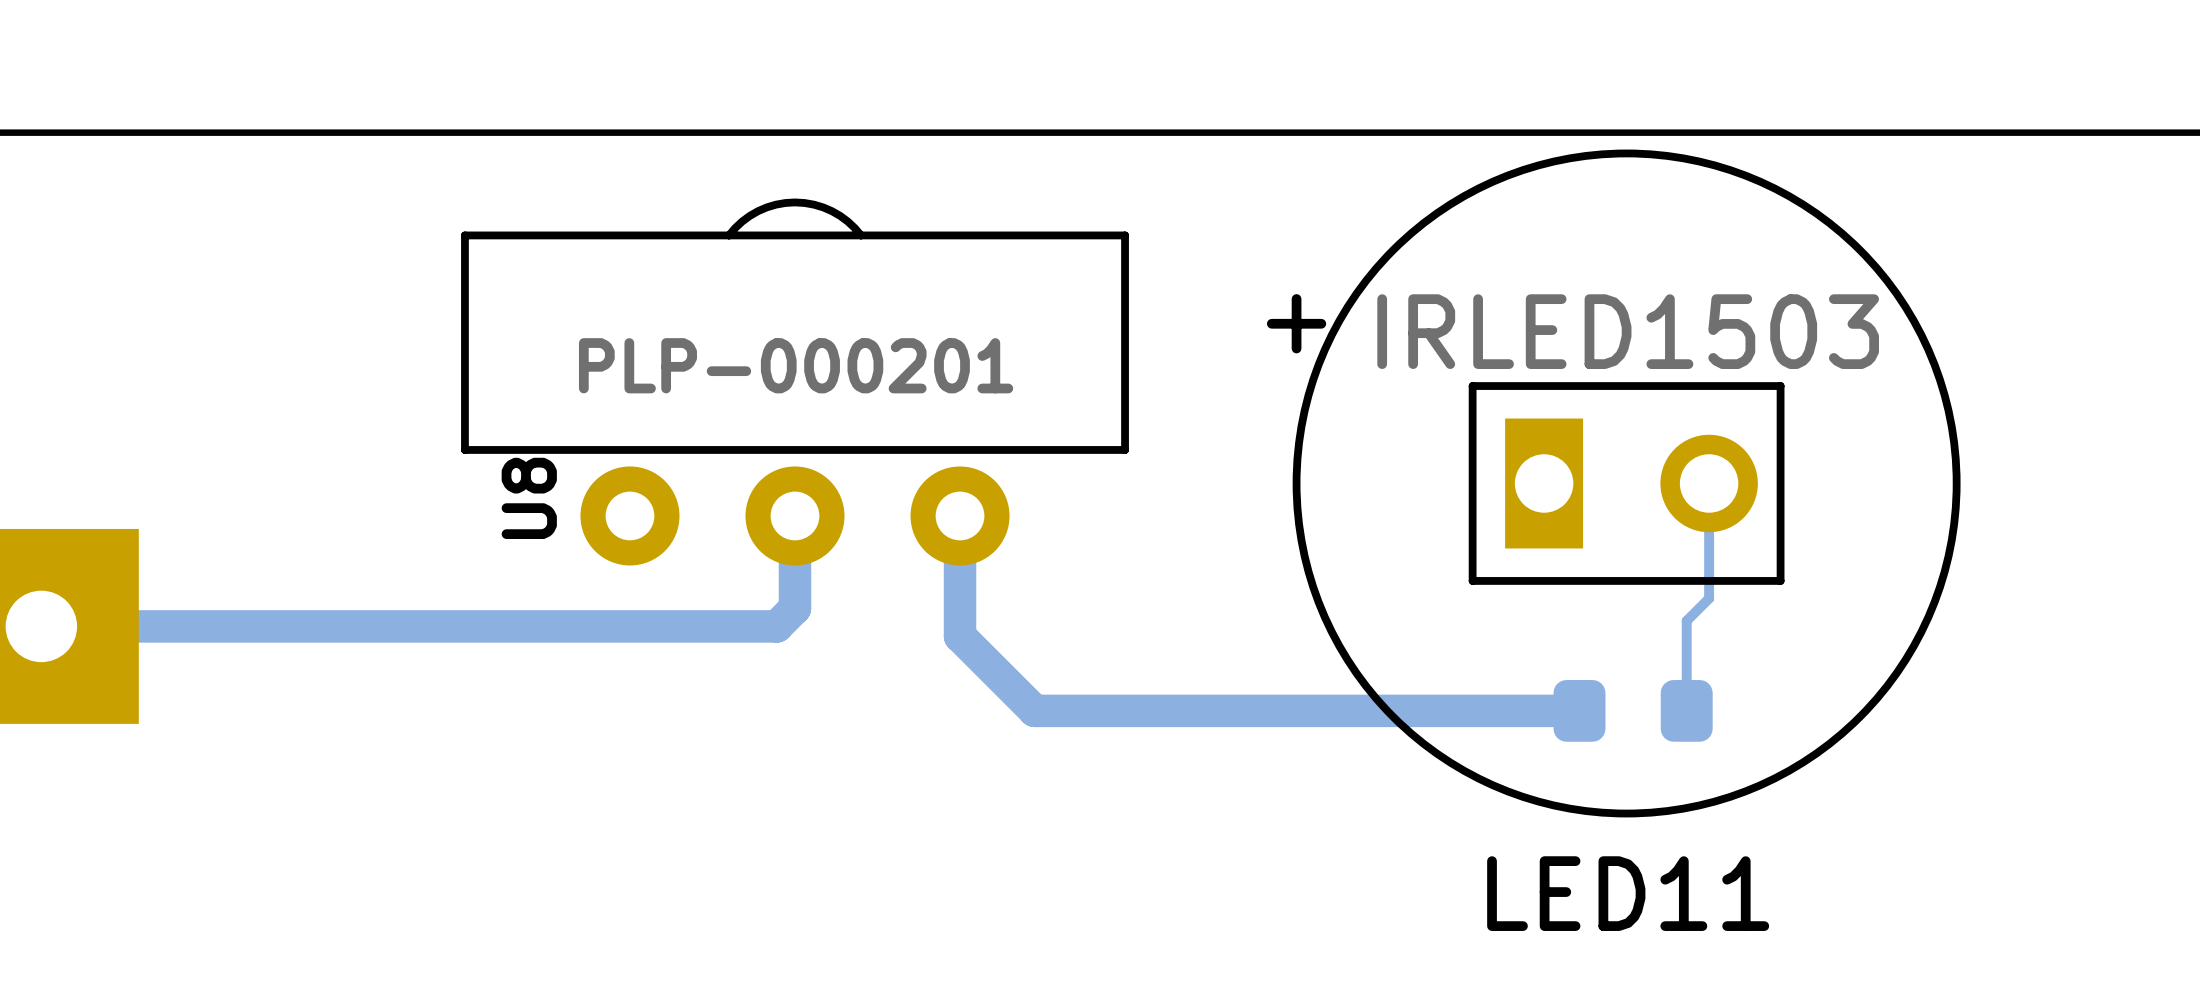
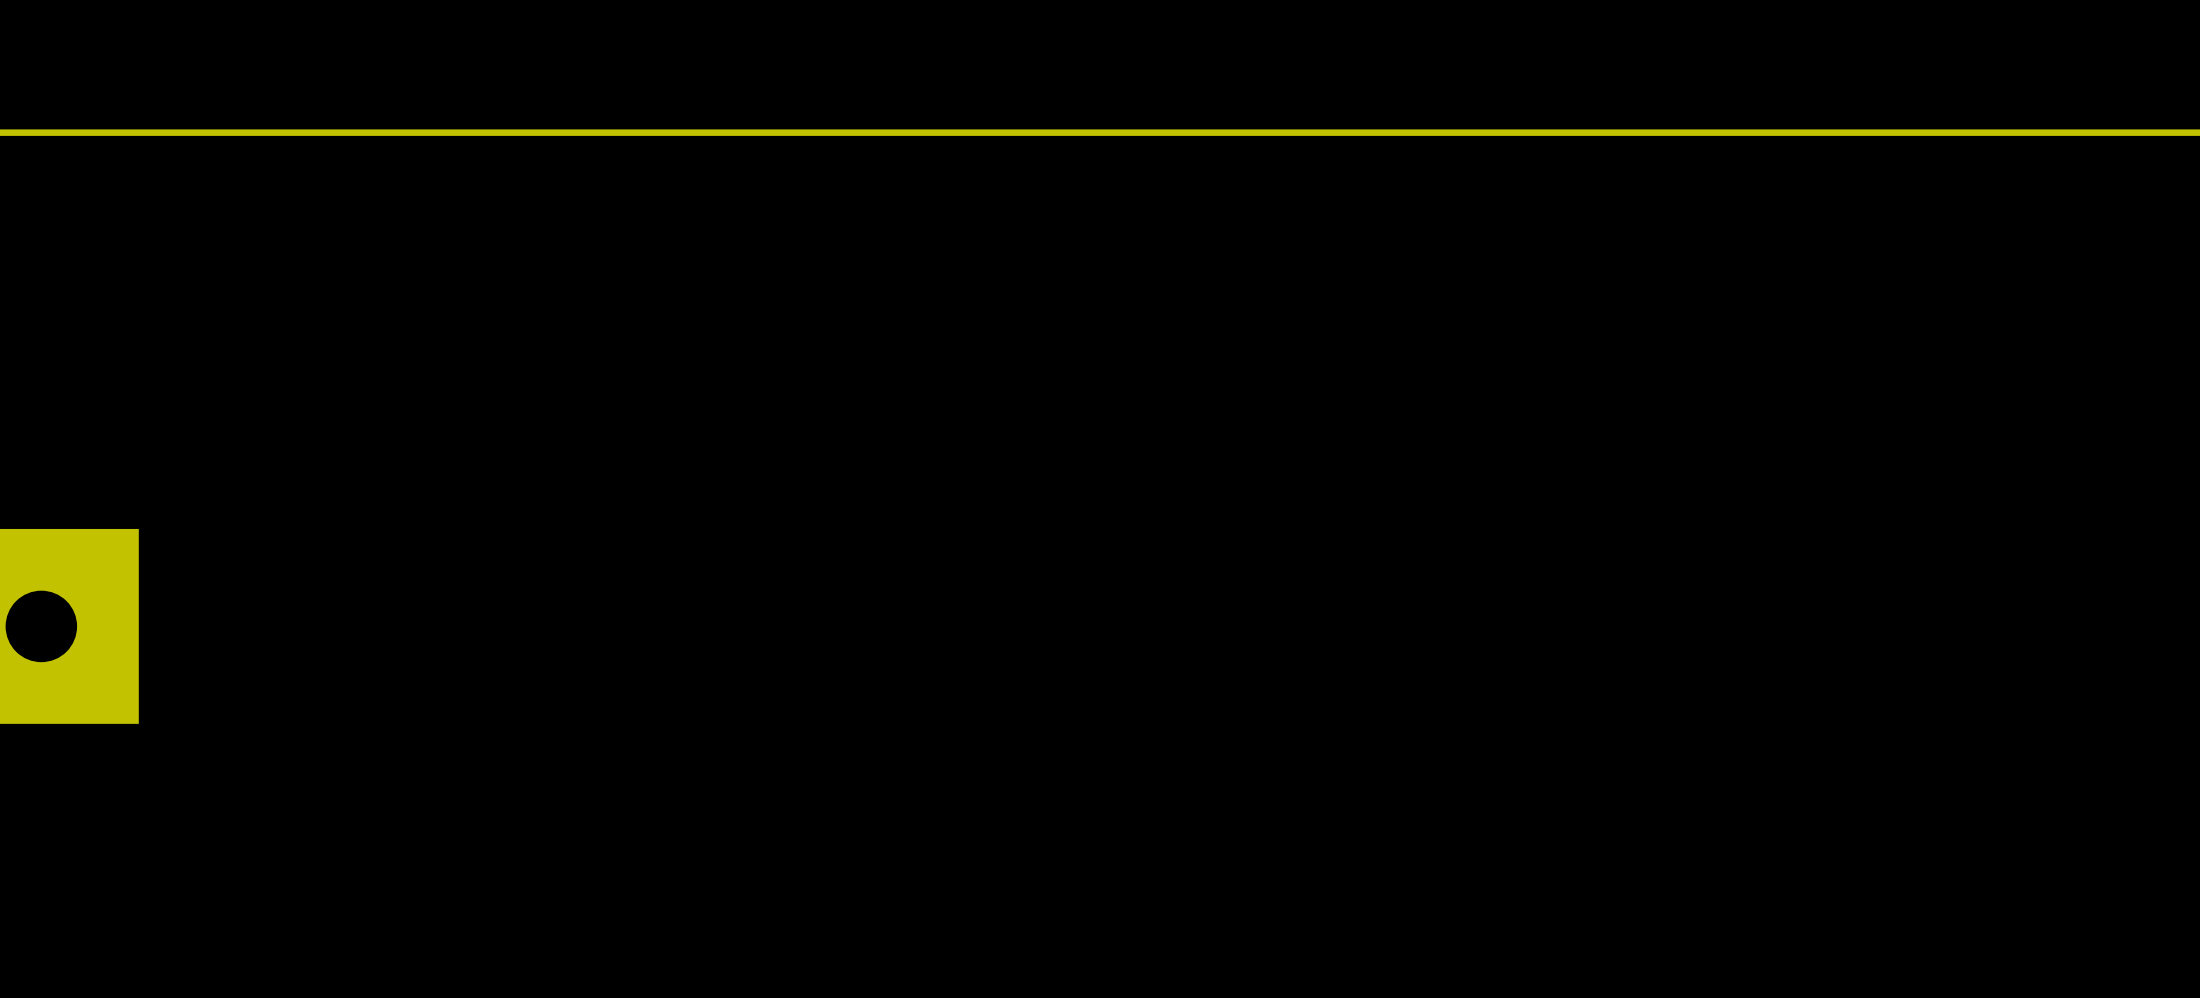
U8: PLP-000201 (795, 382) -> none
LED11: IRLED1503 (1626, 483) -> none
bottom track: (1709, 483) (1709, 598) (1686, 620) (1686, 710) -> none
bottom track: (795, 515) (795, 608) (776, 626) (41, 626) -> none
bottom track: (960, 515) (960, 636) (1034, 710) (1579, 710) -> none
part: (1633, 710) -> none

